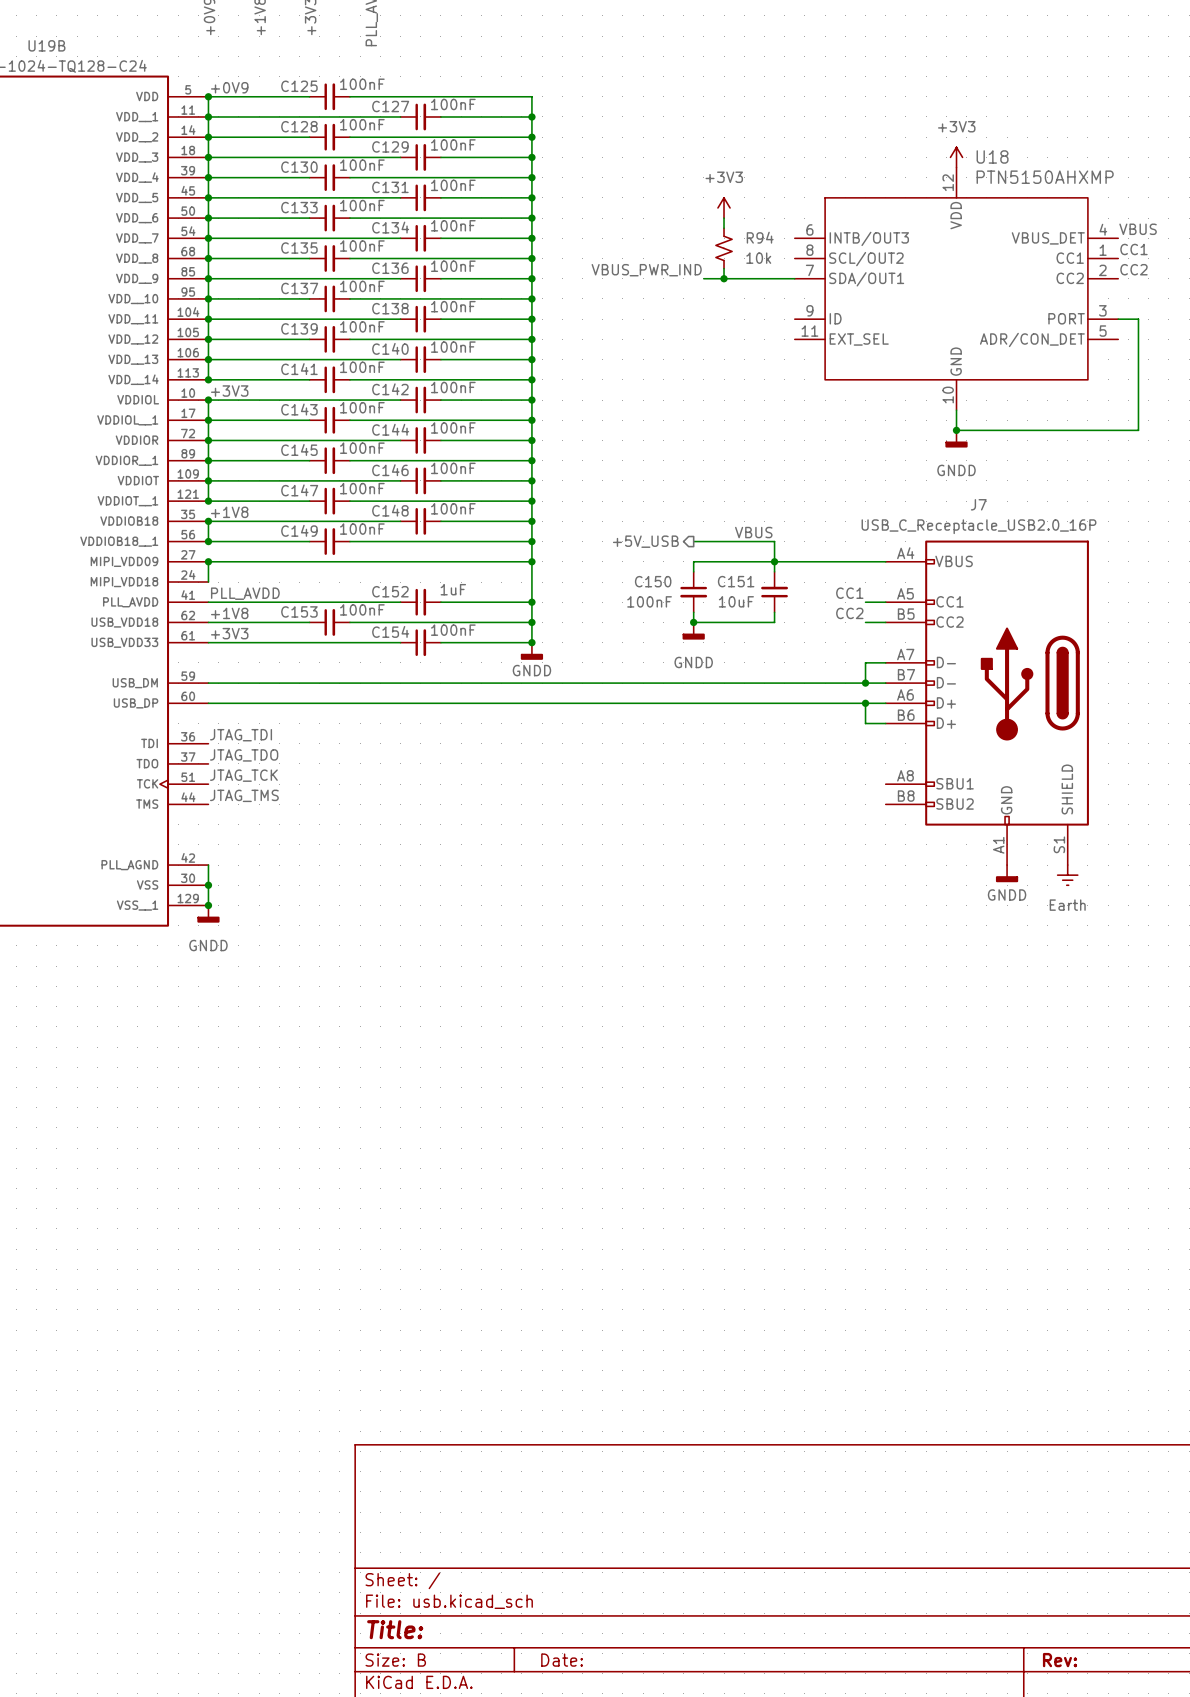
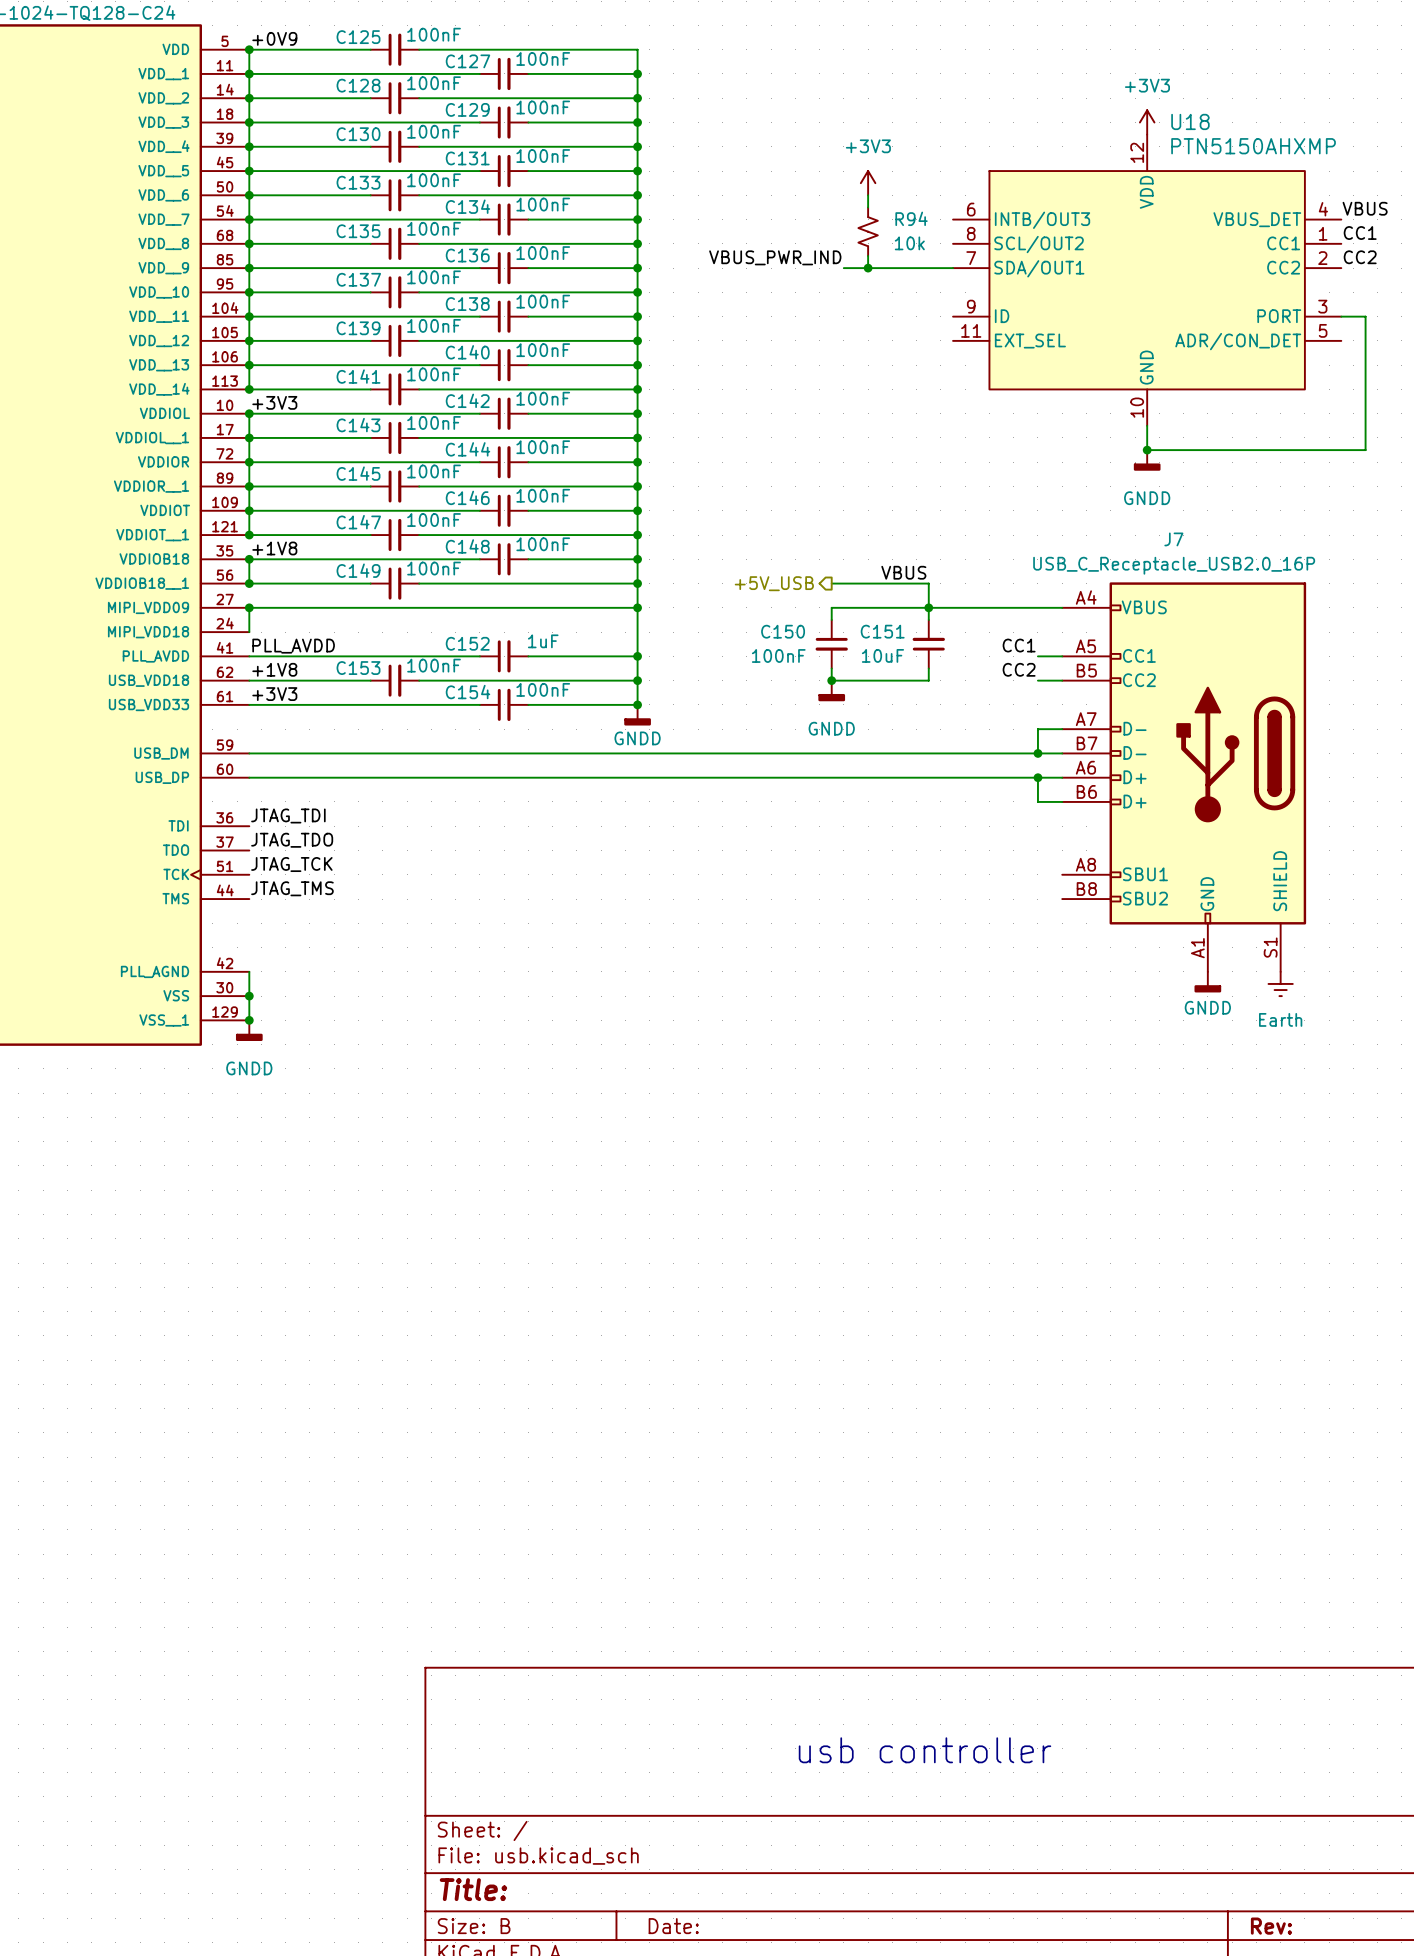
text: none -> usb controller (925, 1750)

